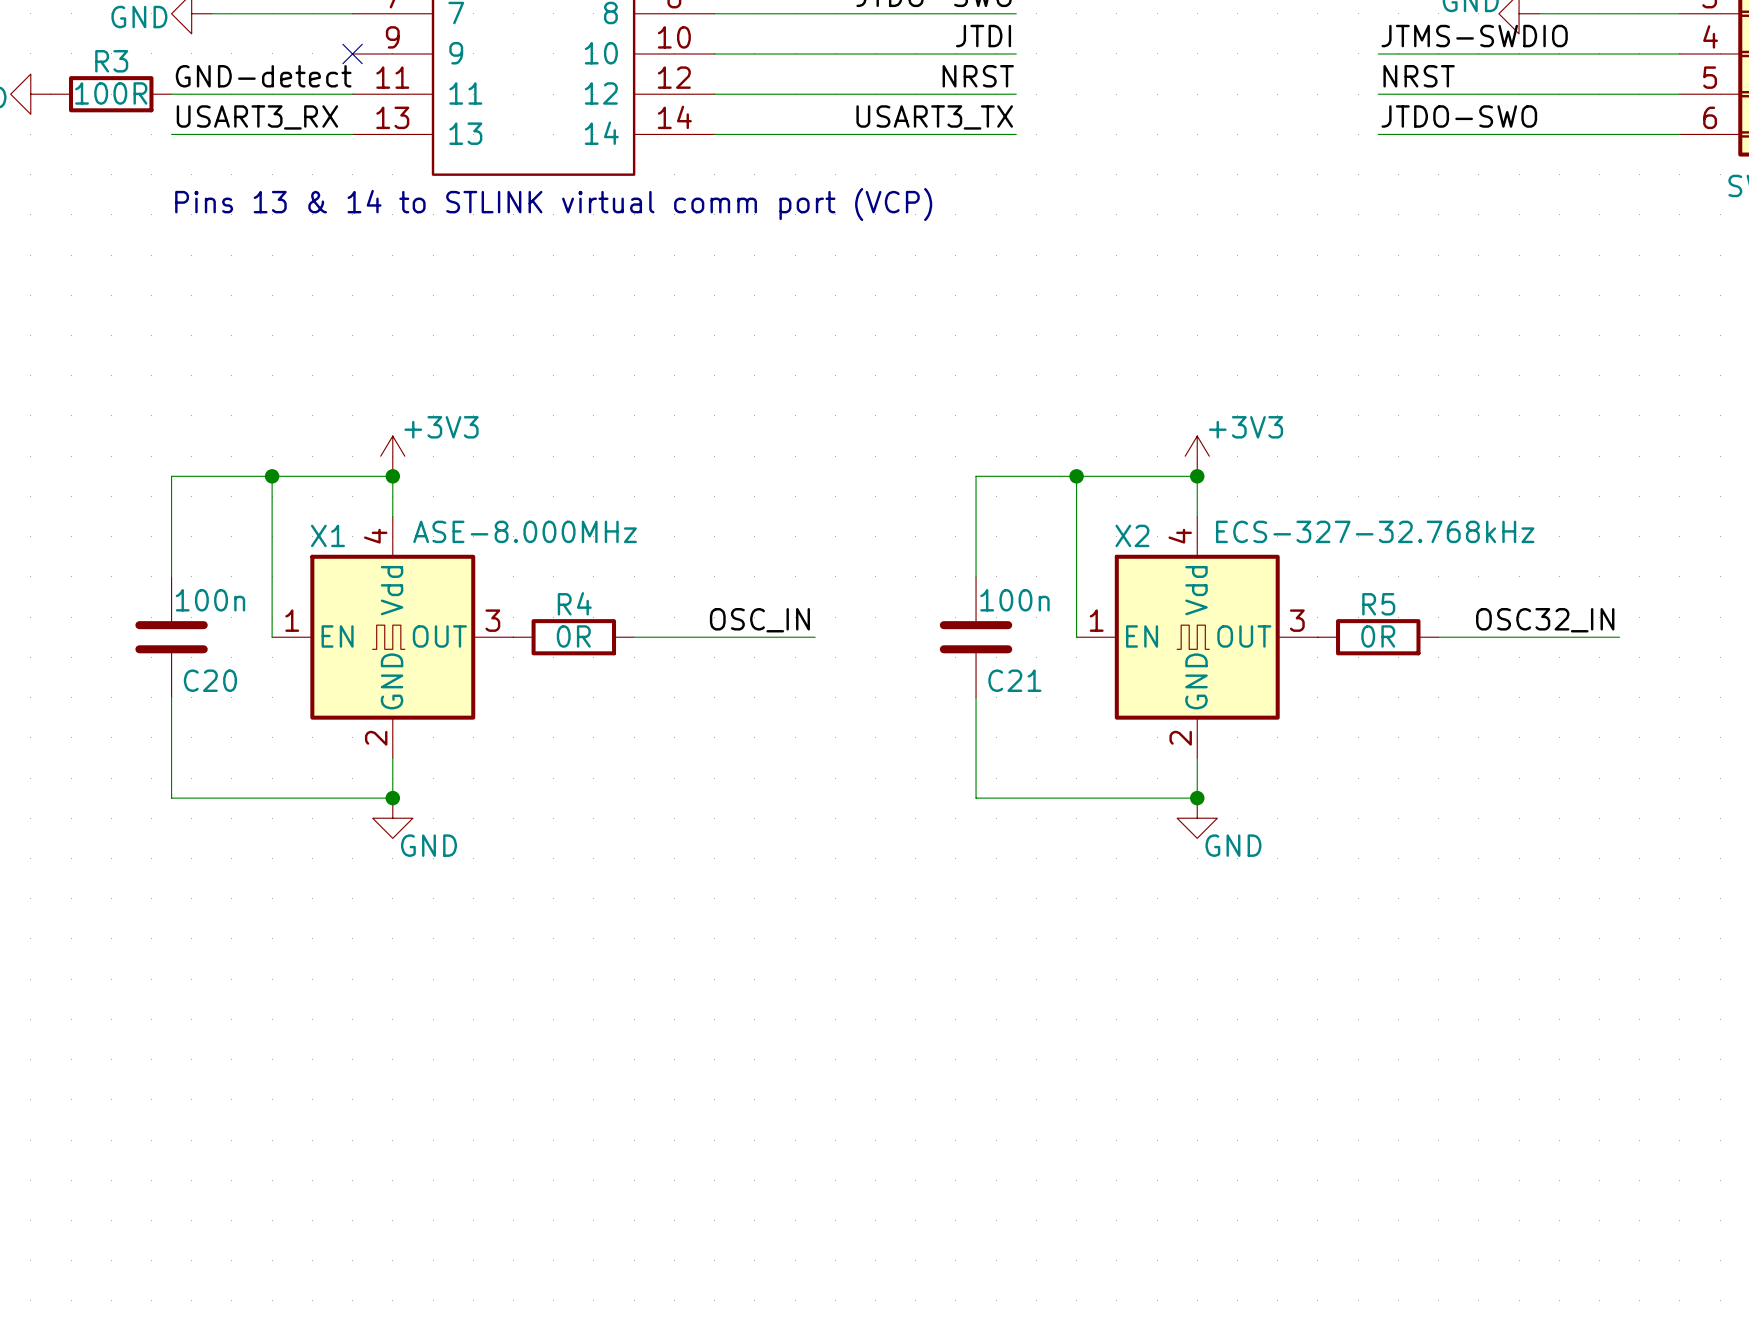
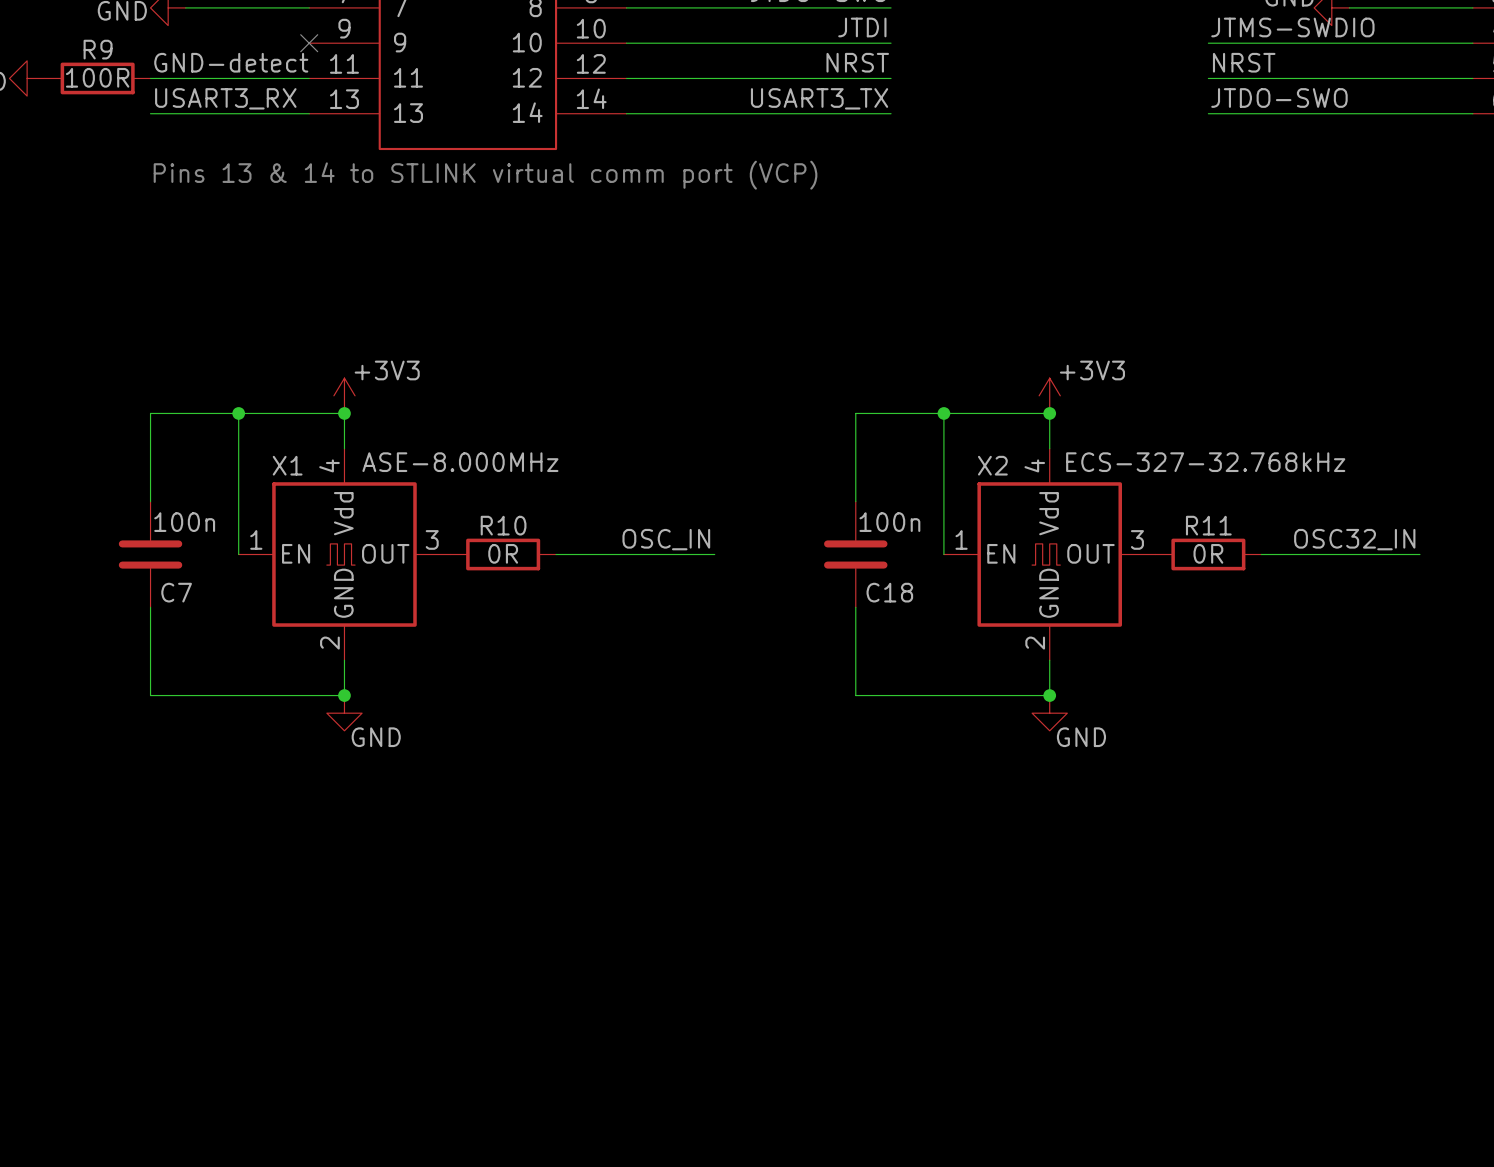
R3 name: R3 (111, 61) -> R9 (98, 49)
R4 name: R4 (574, 603) -> R10 (503, 525)
R5 name: R5 (1378, 604) -> R11 (1208, 525)
C20 name: C20 (210, 680) -> C7 (176, 592)
C21 name: C21 (1014, 680) -> C18 (889, 592)

